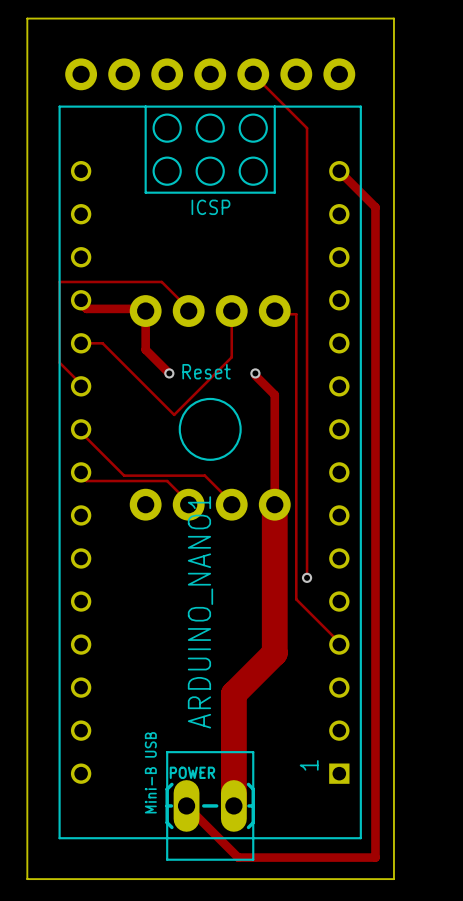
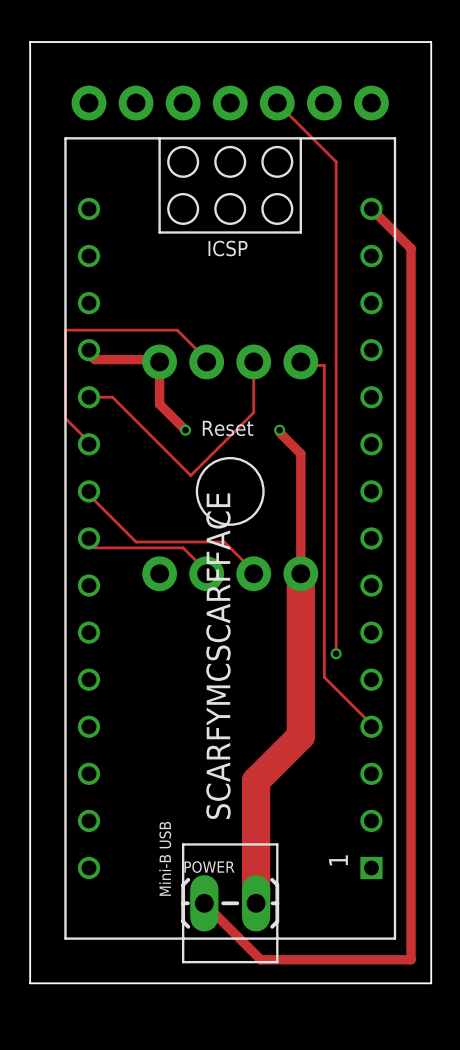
ARDUINO_NANO1 name: ARDUINO_NANO1 (200, 612) -> SCARFYMCSCARFFACE (218, 656)

